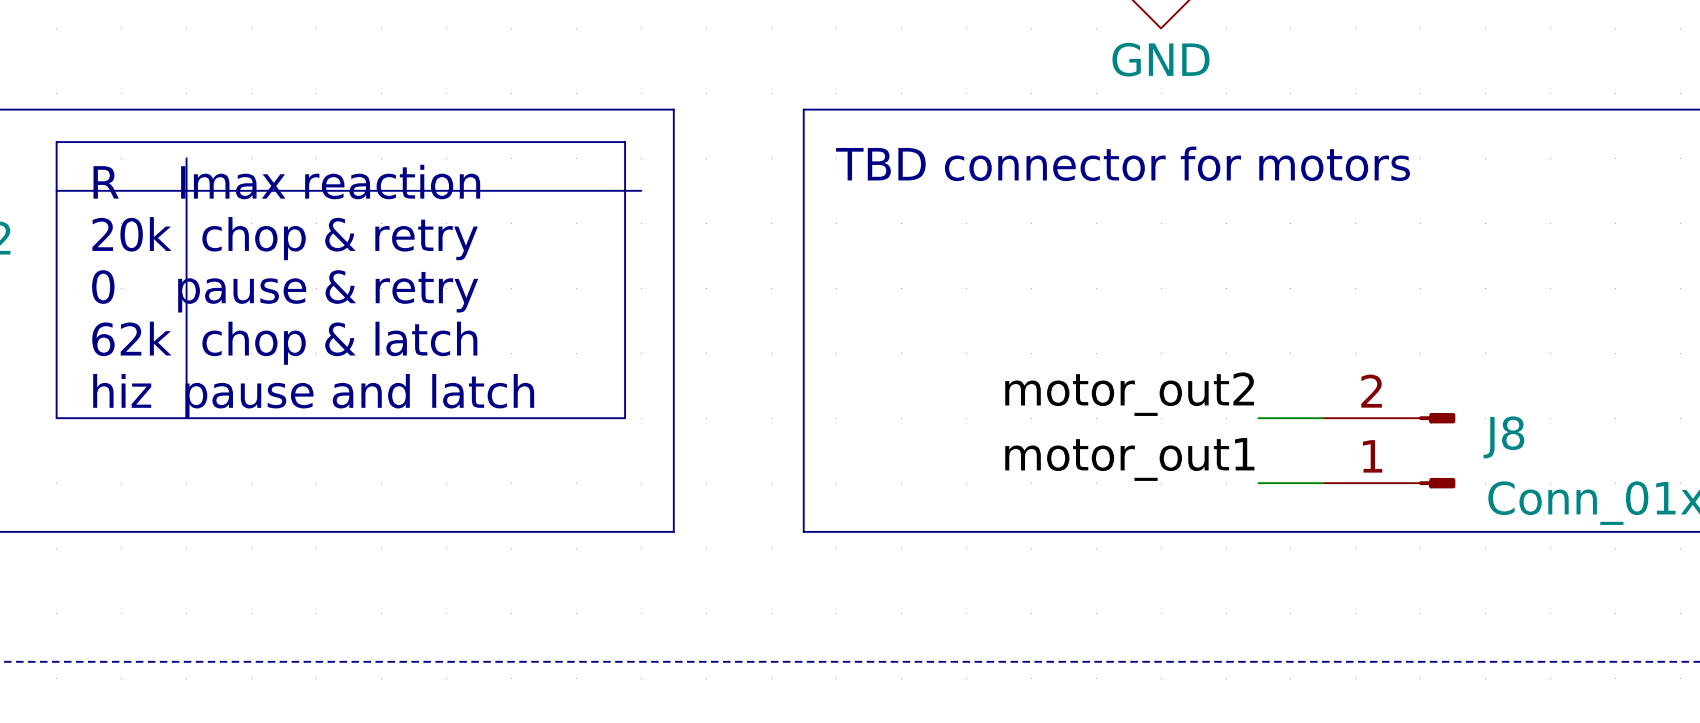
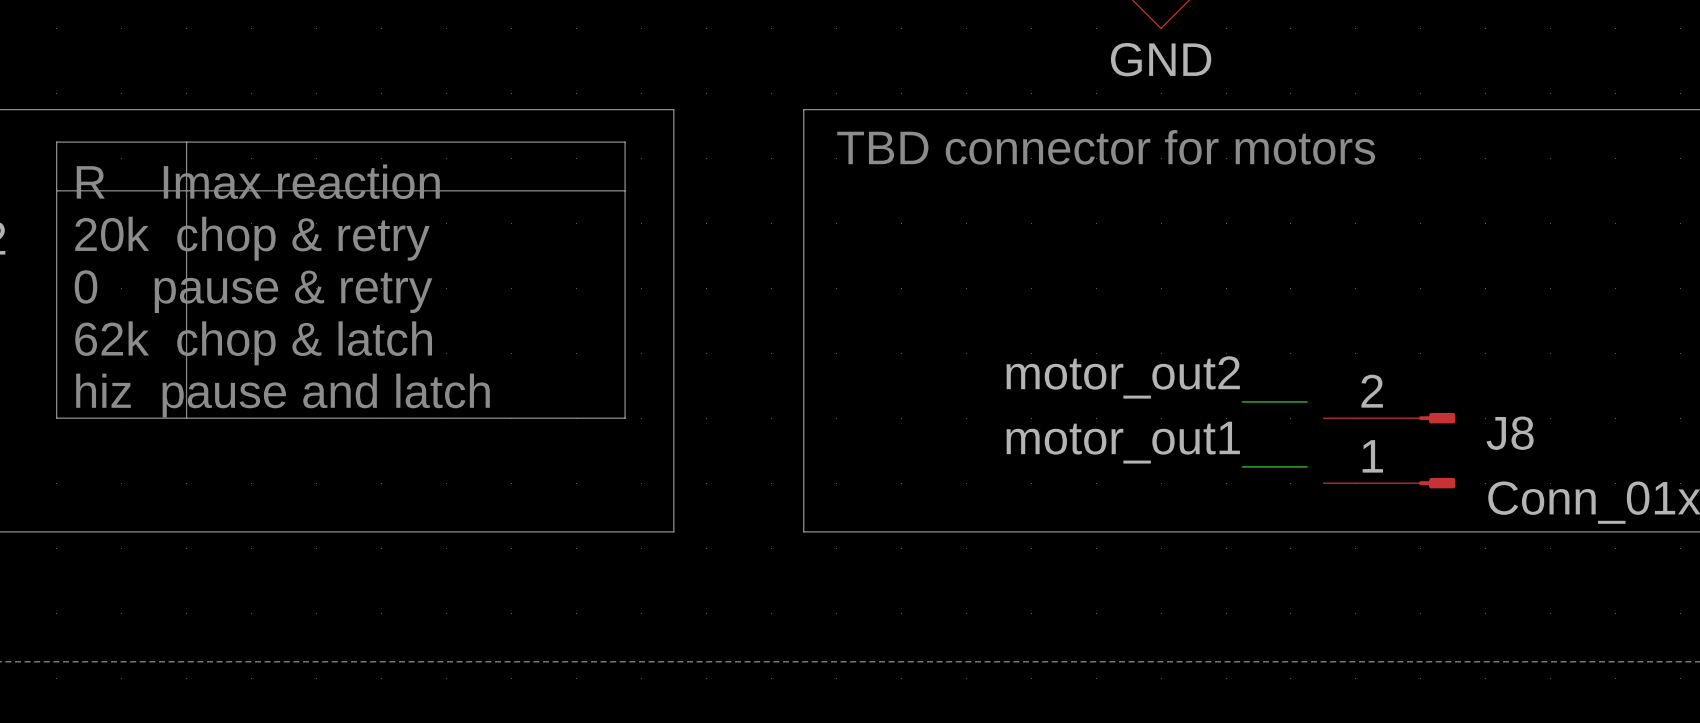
line: none -> (186, 142) (186, 158)
text position: TBD connector for motors (1123, 163) -> TBD connector for motors (1106, 147)
text position: R Imax reaction (286, 182) -> R Imax reaction (258, 181)
line: (625, 190) (641, 190) -> none
text position: 20k chop & retry (285, 238) -> 20k chop & retry (252, 238)
text position: 0 pause & retry (285, 291) -> 0 pause & retry (253, 291)
text position: 62k chop & latch (284, 343) -> 62k chop & latch (253, 343)
label position: motor_out2 (1129, 394) -> motor_out2 (1123, 377)
text position: hiz pause and latch (313, 395) -> hiz pause and latch (282, 395)
wire: (1258, 418) (1323, 418) -> (1242, 401) (1307, 401)
label position: motor_out1 (1129, 459) -> motor_out1 (1123, 442)
wire: (1258, 483) (1323, 483) -> (1242, 466) (1307, 466)

